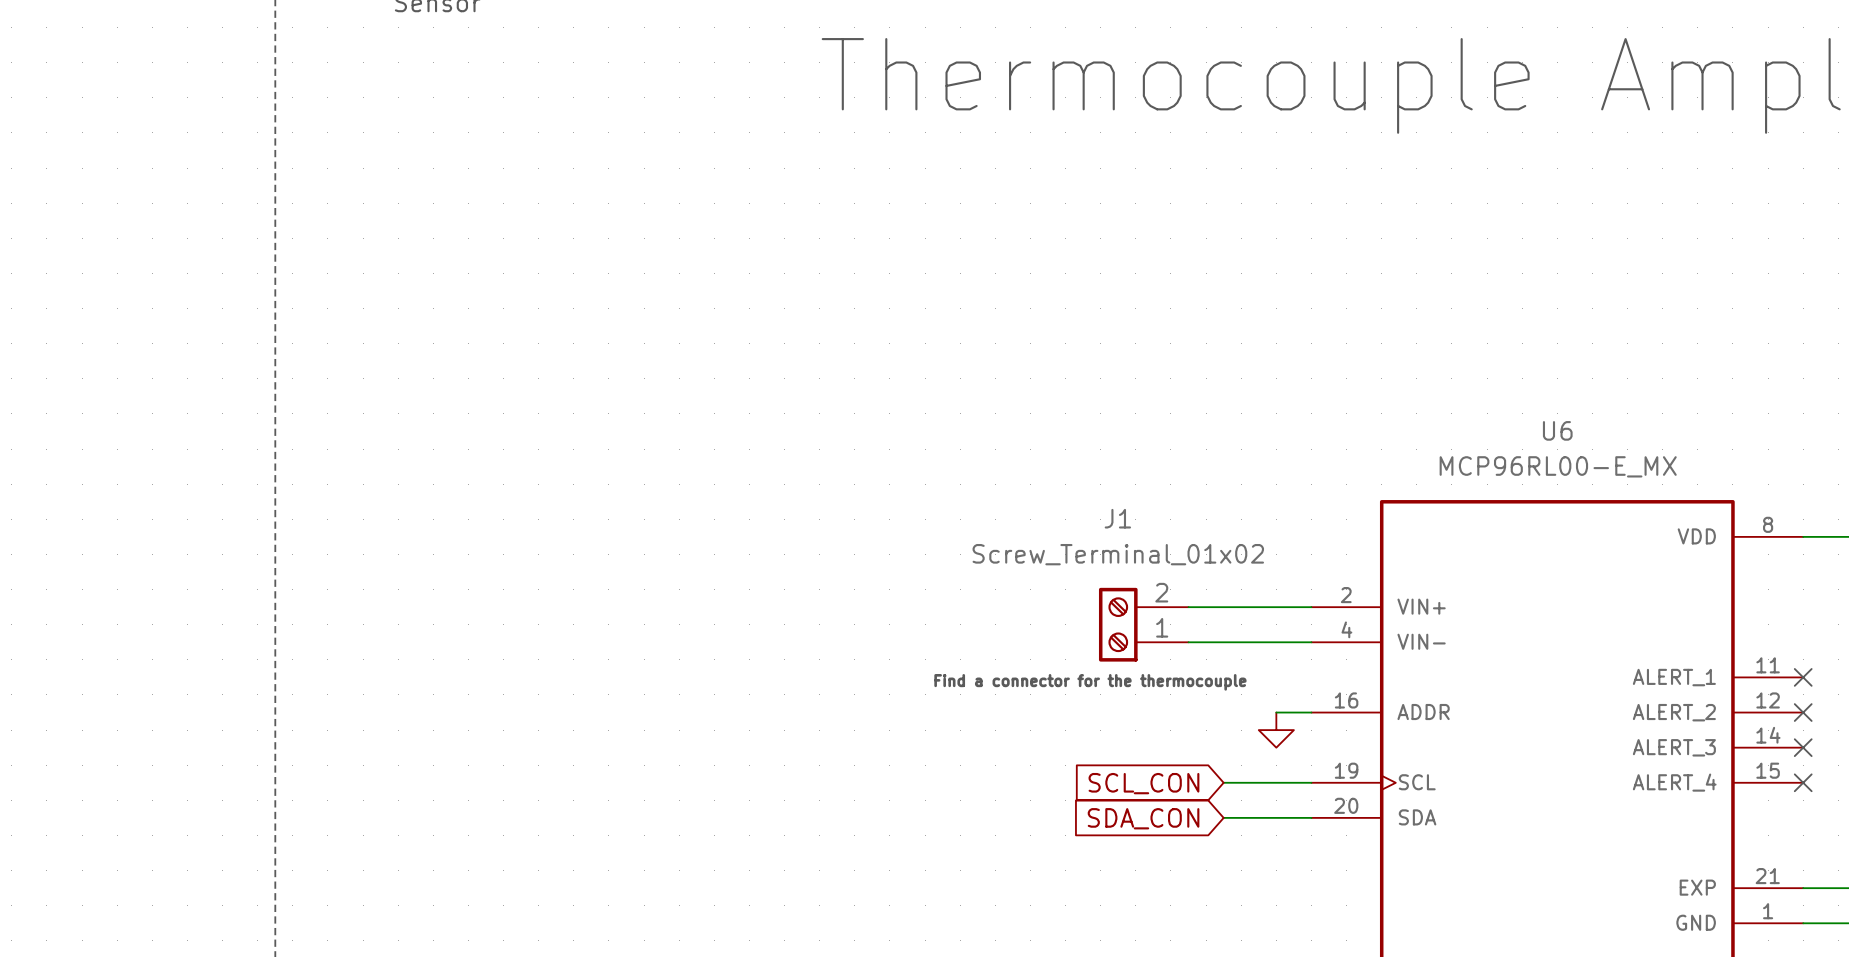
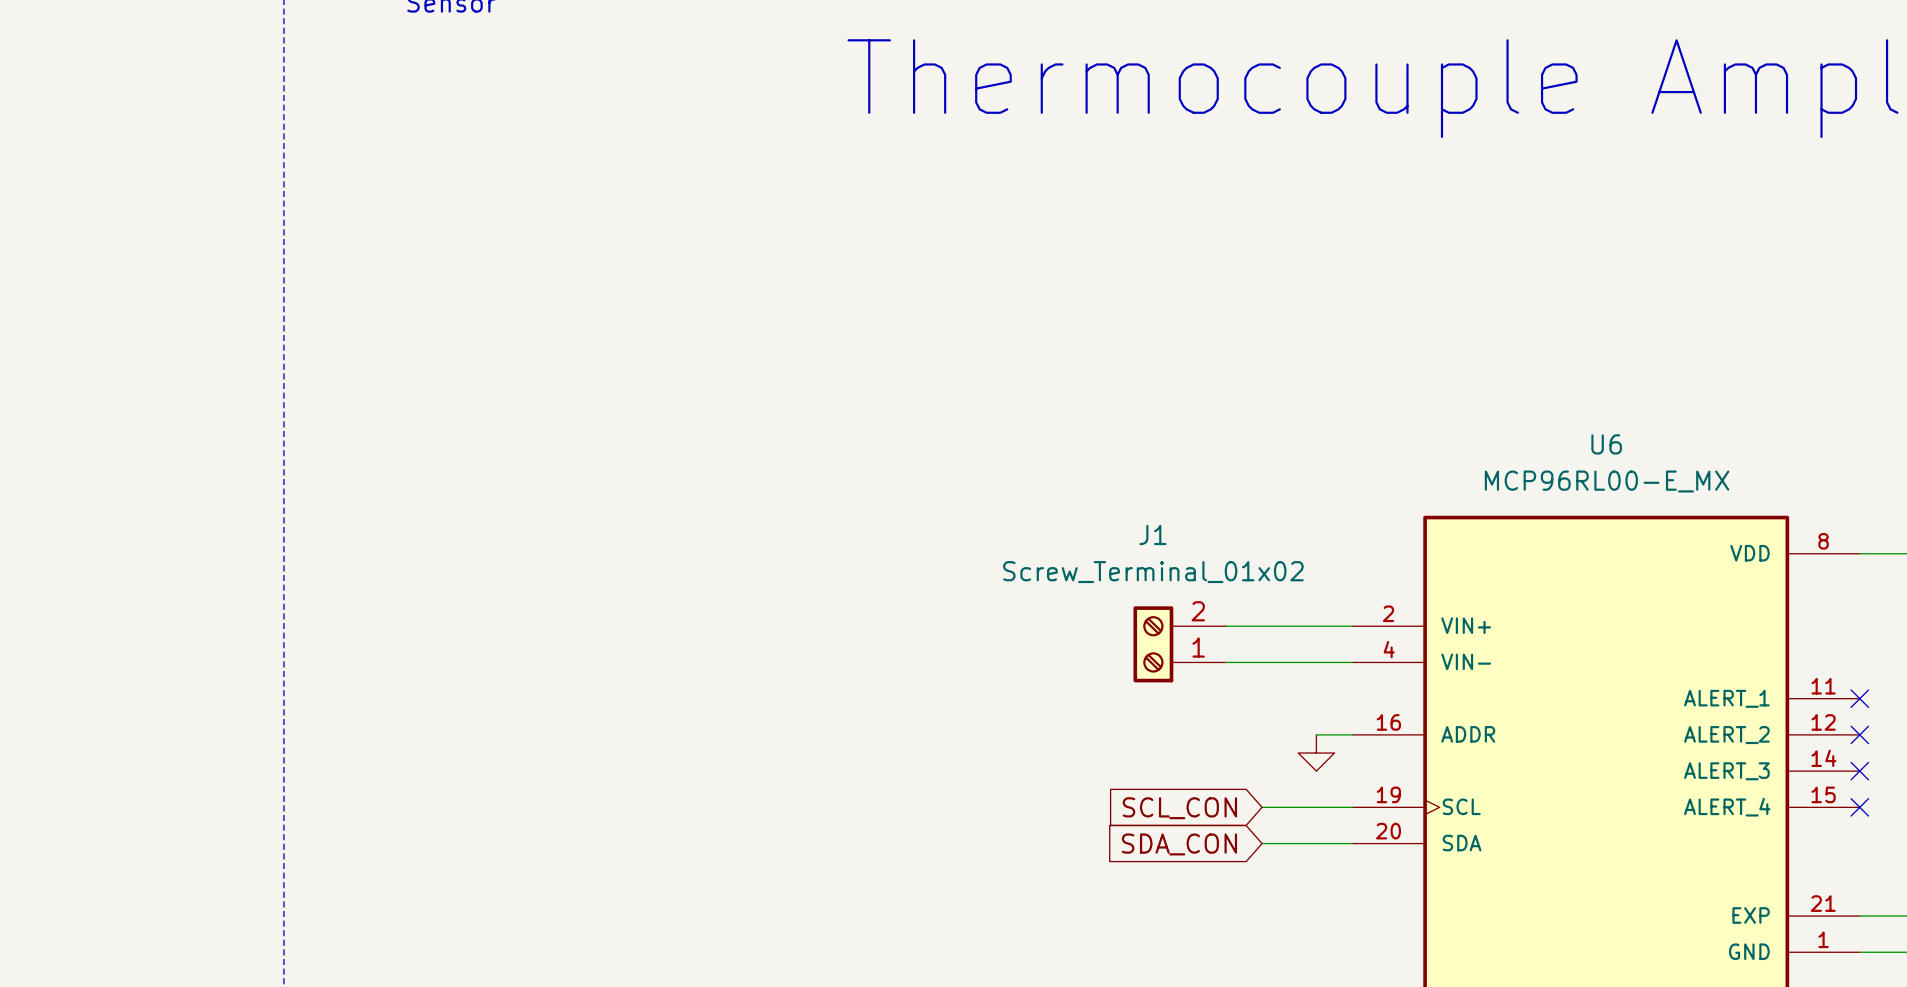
text: Find a connector for the thermocouple (1090, 682) -> none

